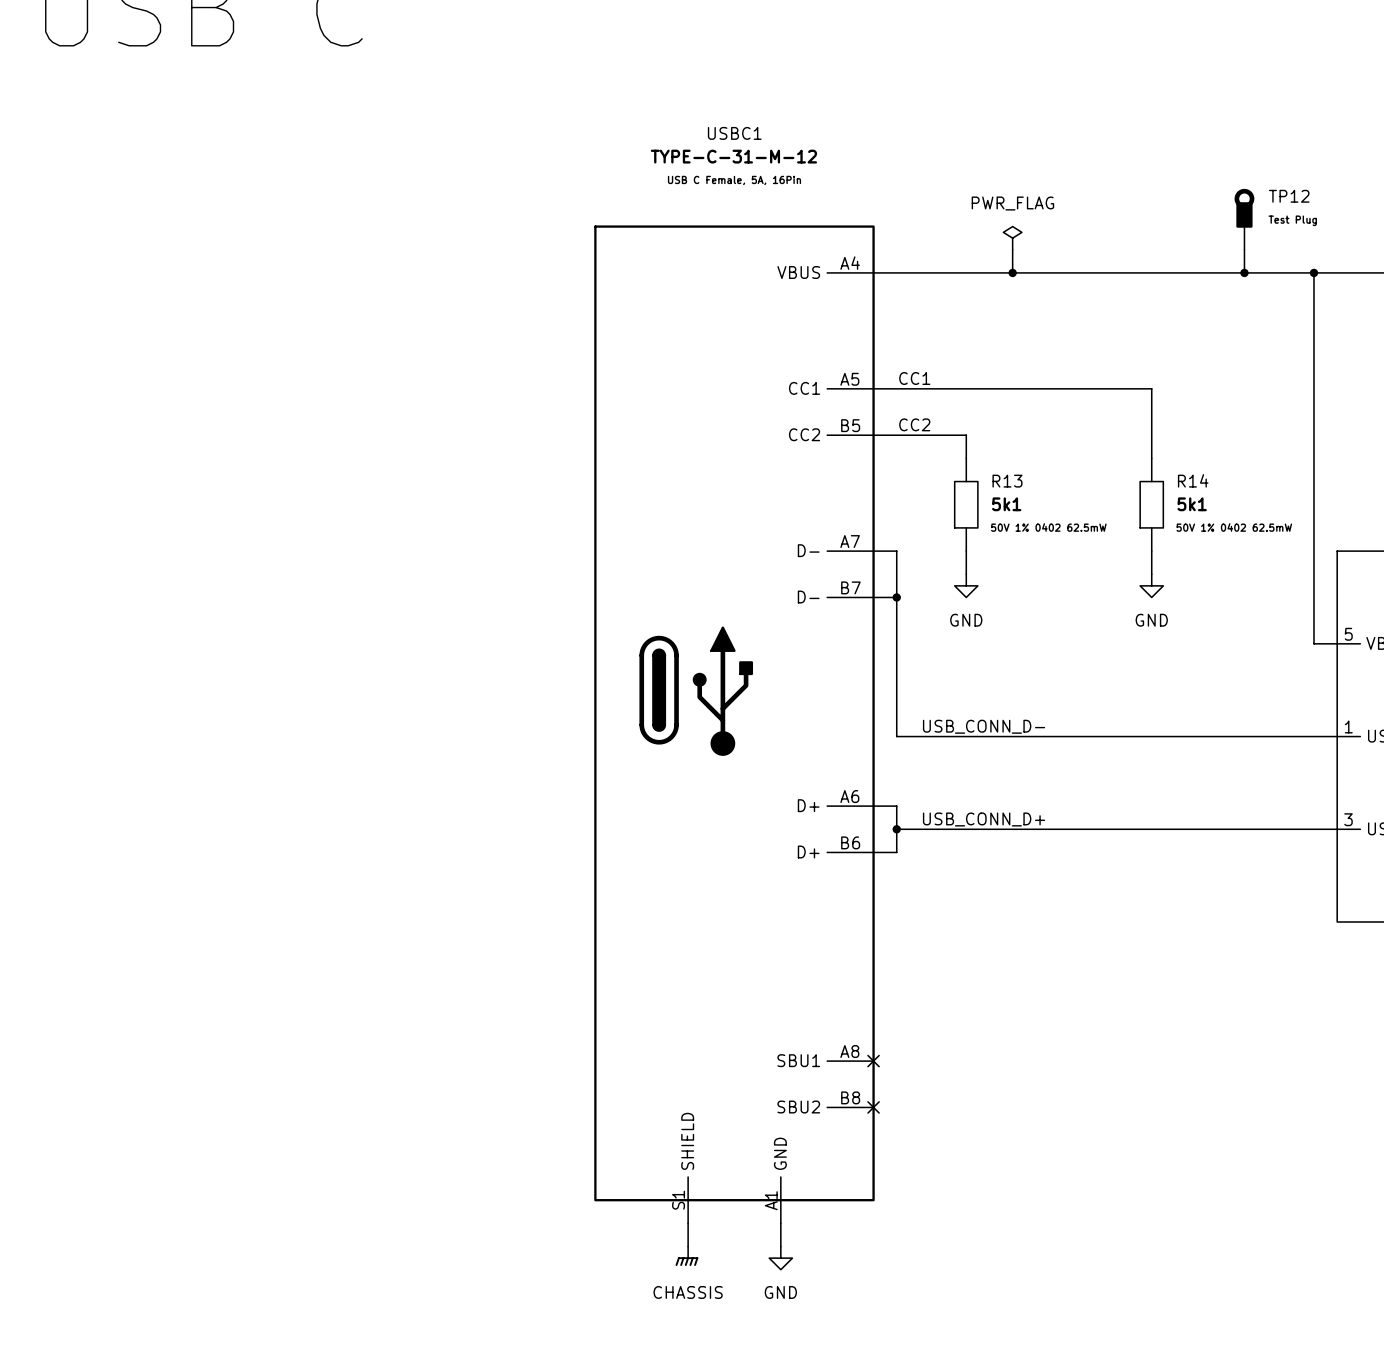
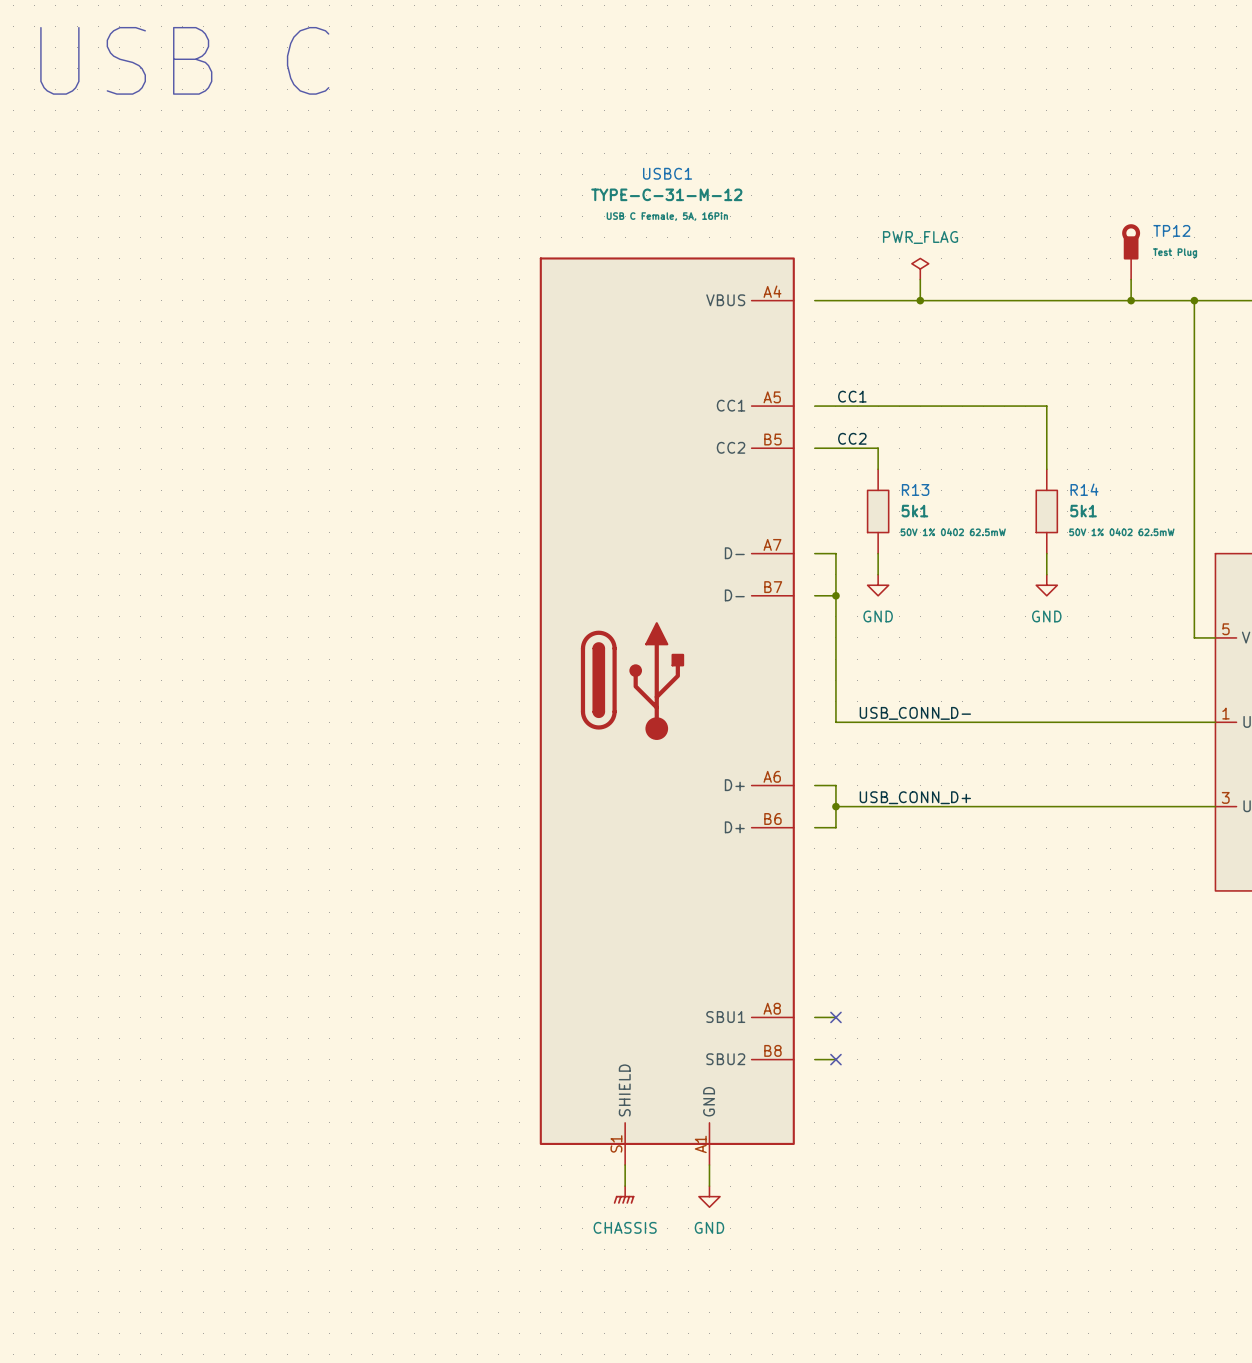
wire: (873, 272) (896, 272) -> none
label position: CC1 (914, 378) -> CC1 (852, 396)
wire: (873, 388) (896, 388) -> none
label position: CC2 (914, 424) -> CC2 (852, 438)
wire: (873, 435) (896, 435) -> none
wire: (873, 551) (896, 551) (896, 736) (919, 736) -> (814, 553) (835, 553) (835, 722)
wire: (873, 597) (896, 597) -> (835, 595) (814, 595)
junction position: (896, 597) -> (835, 595)
label position: USB_CONN_D- (984, 726) -> USB_CONN_D- (915, 713)
wire: (873, 806) (896, 806) (896, 852) (873, 852) -> (814, 785) (835, 785) (835, 827) (814, 827)
label position: USB_CONN_D+ (984, 819) -> USB_CONN_D+ (915, 797)
wire: (896, 829) (919, 829) -> none
junction position: (896, 829) -> (835, 806)
no-connect mark: (873, 1061) -> none
wire: none -> (814, 1017) (835, 1017)
no-connect mark: none -> (835, 1017)
no-connect mark: (873, 1107) -> none
wire: none -> (814, 1059) (835, 1059)
no-connect mark: none -> (835, 1059)

